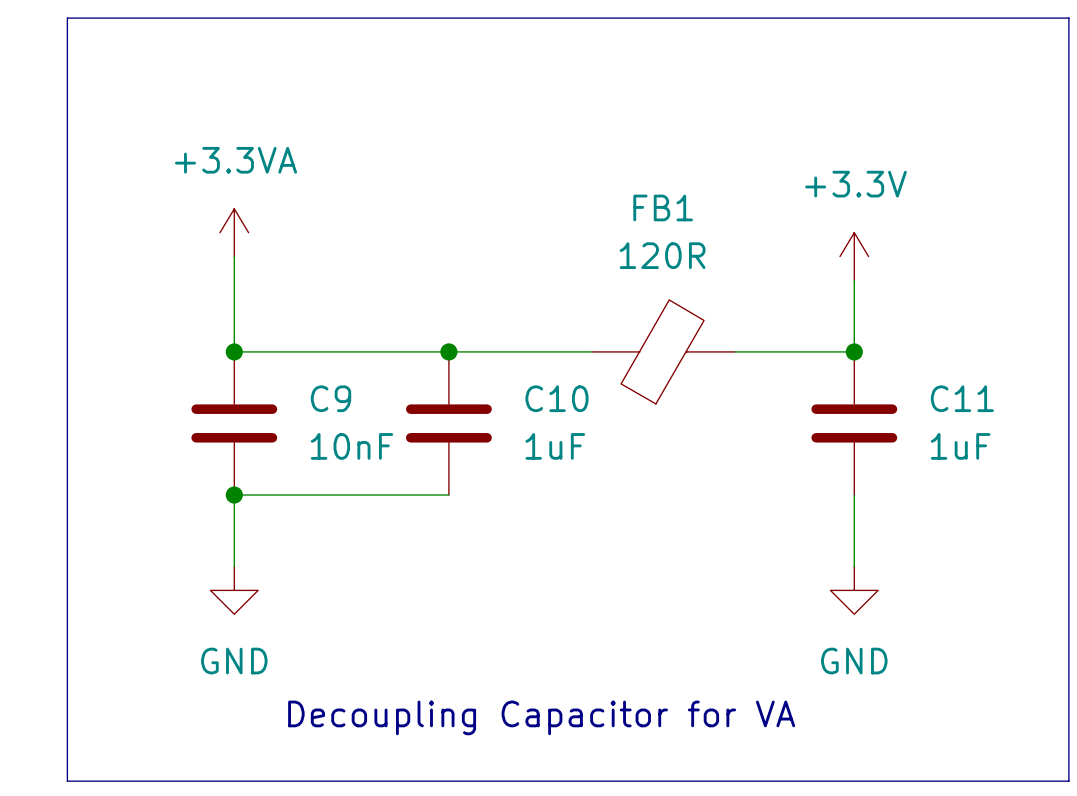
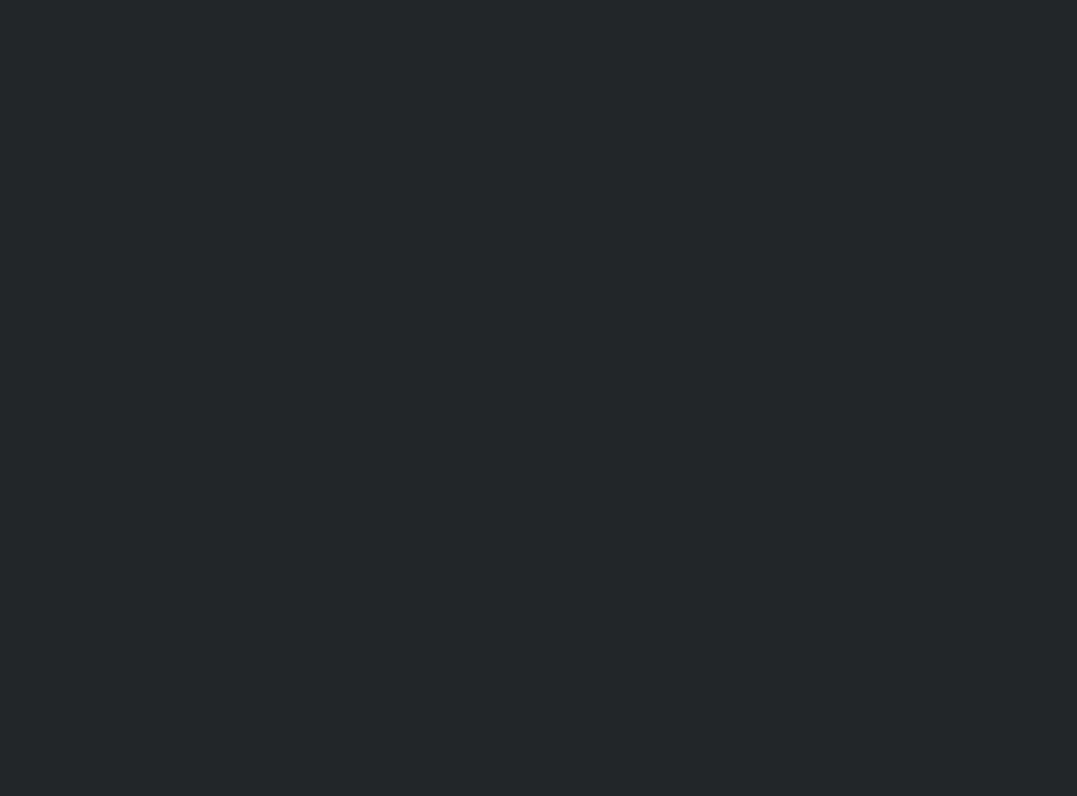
line: (67, 18) (1068, 18) (1068, 781) (67, 781) (67, 18) -> none
power symbol: +3.3VA (234, 232) -> none
wire: (234, 256) (234, 351) (591, 351) -> none
power symbol: +3.3V (854, 256) -> none
wire: (854, 280) (854, 351) (735, 351) -> none
junction: (234, 351) -> none
junction: (448, 351) -> none
FB1: 120R (663, 351) -> none
junction: (854, 351) -> none
C9: 10nF (234, 423) -> none
C10: 1uF (448, 423) -> none
C11: 1uF (854, 423) -> none
junction: (234, 495) -> none
wire: (448, 495) (234, 495) (234, 566) -> none
wire: (854, 495) (854, 566) -> none
power symbol: GND (234, 590) -> none
power symbol: GND (854, 590) -> none
text: Decoupling Capacitor for VA (541, 717) -> none

